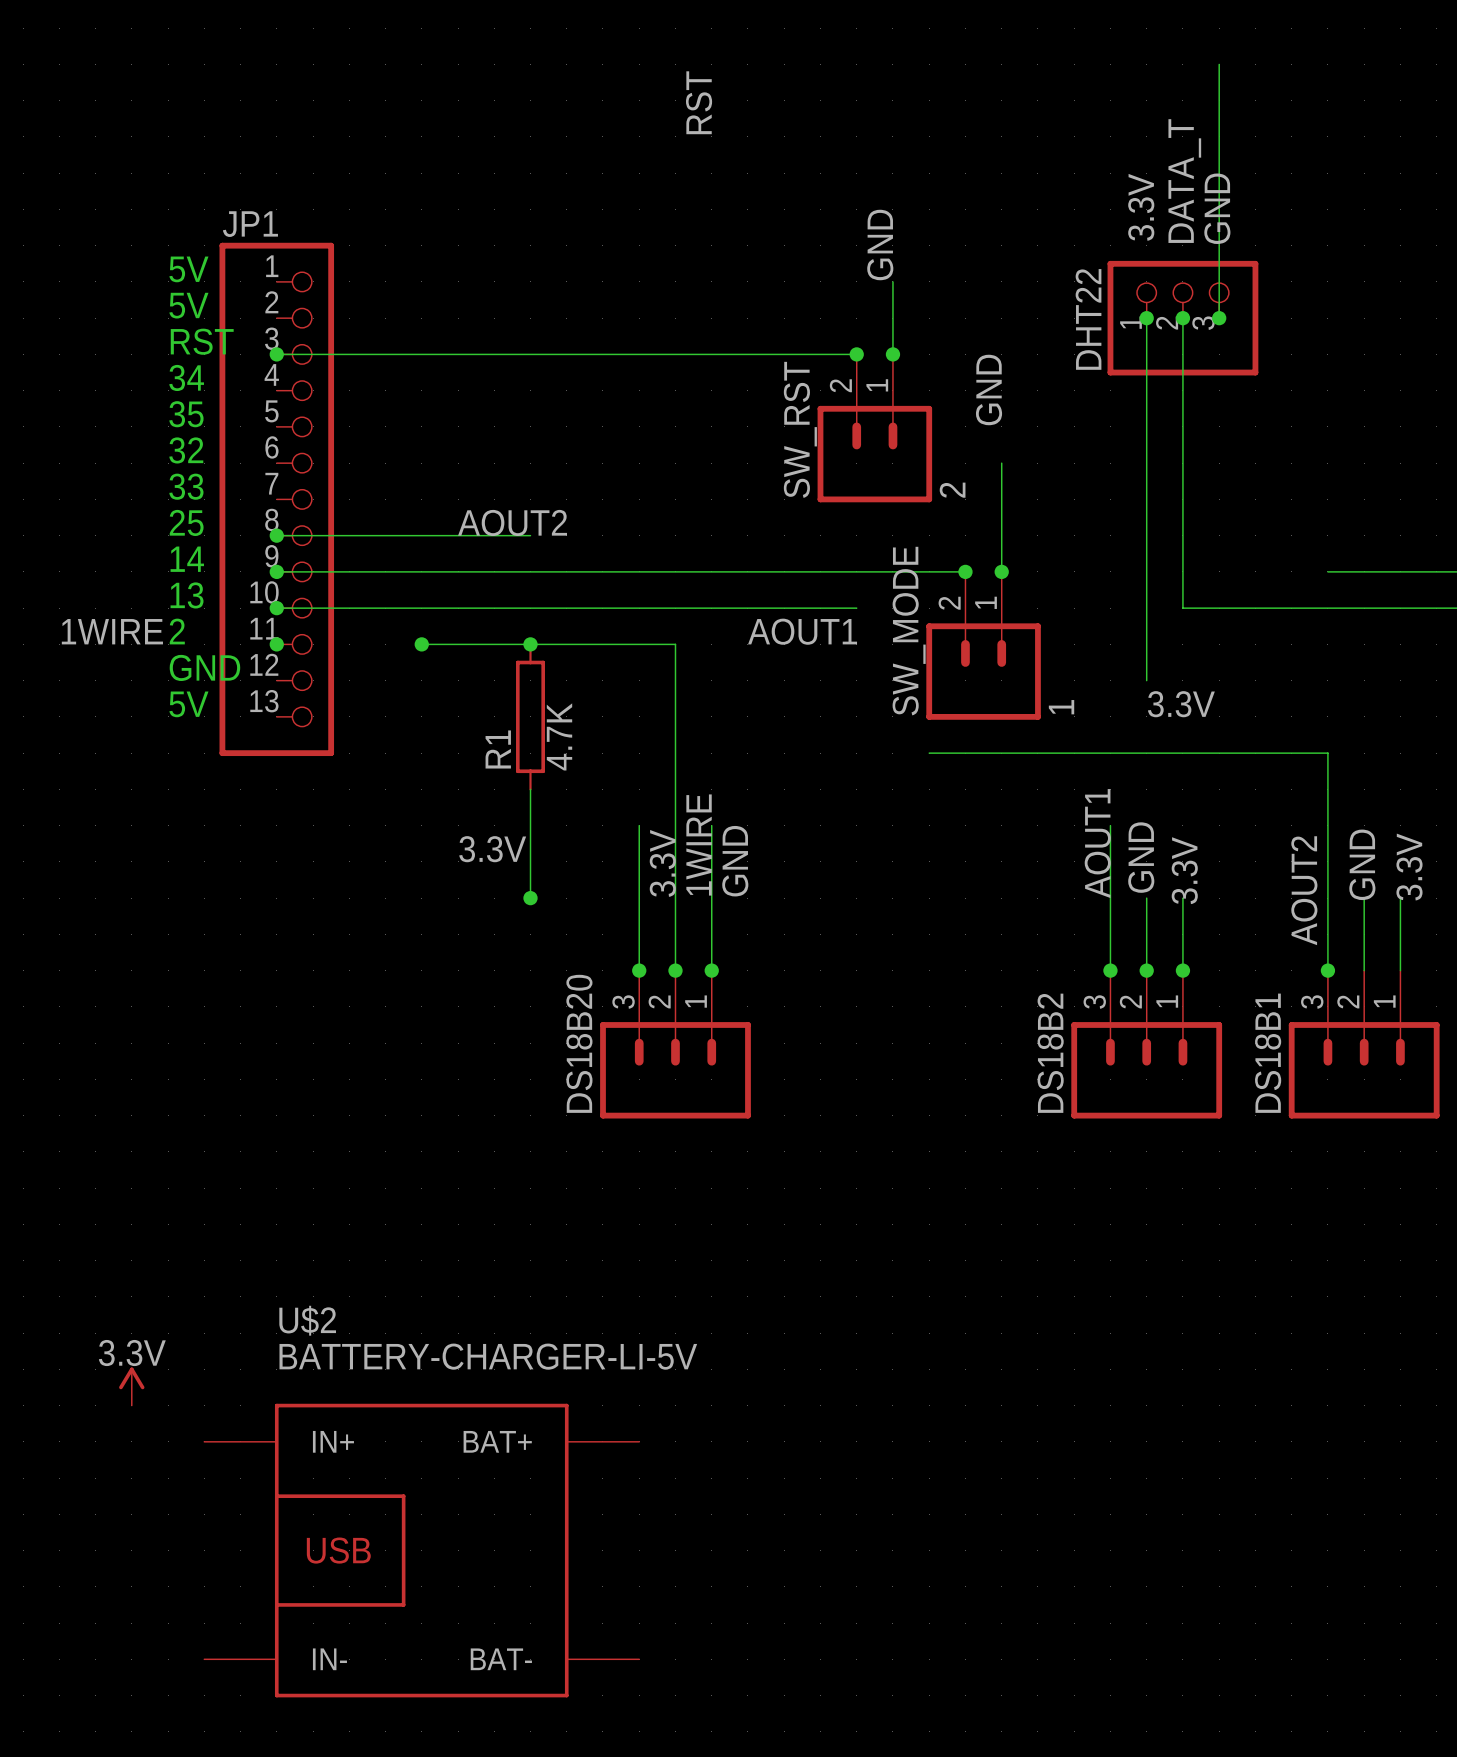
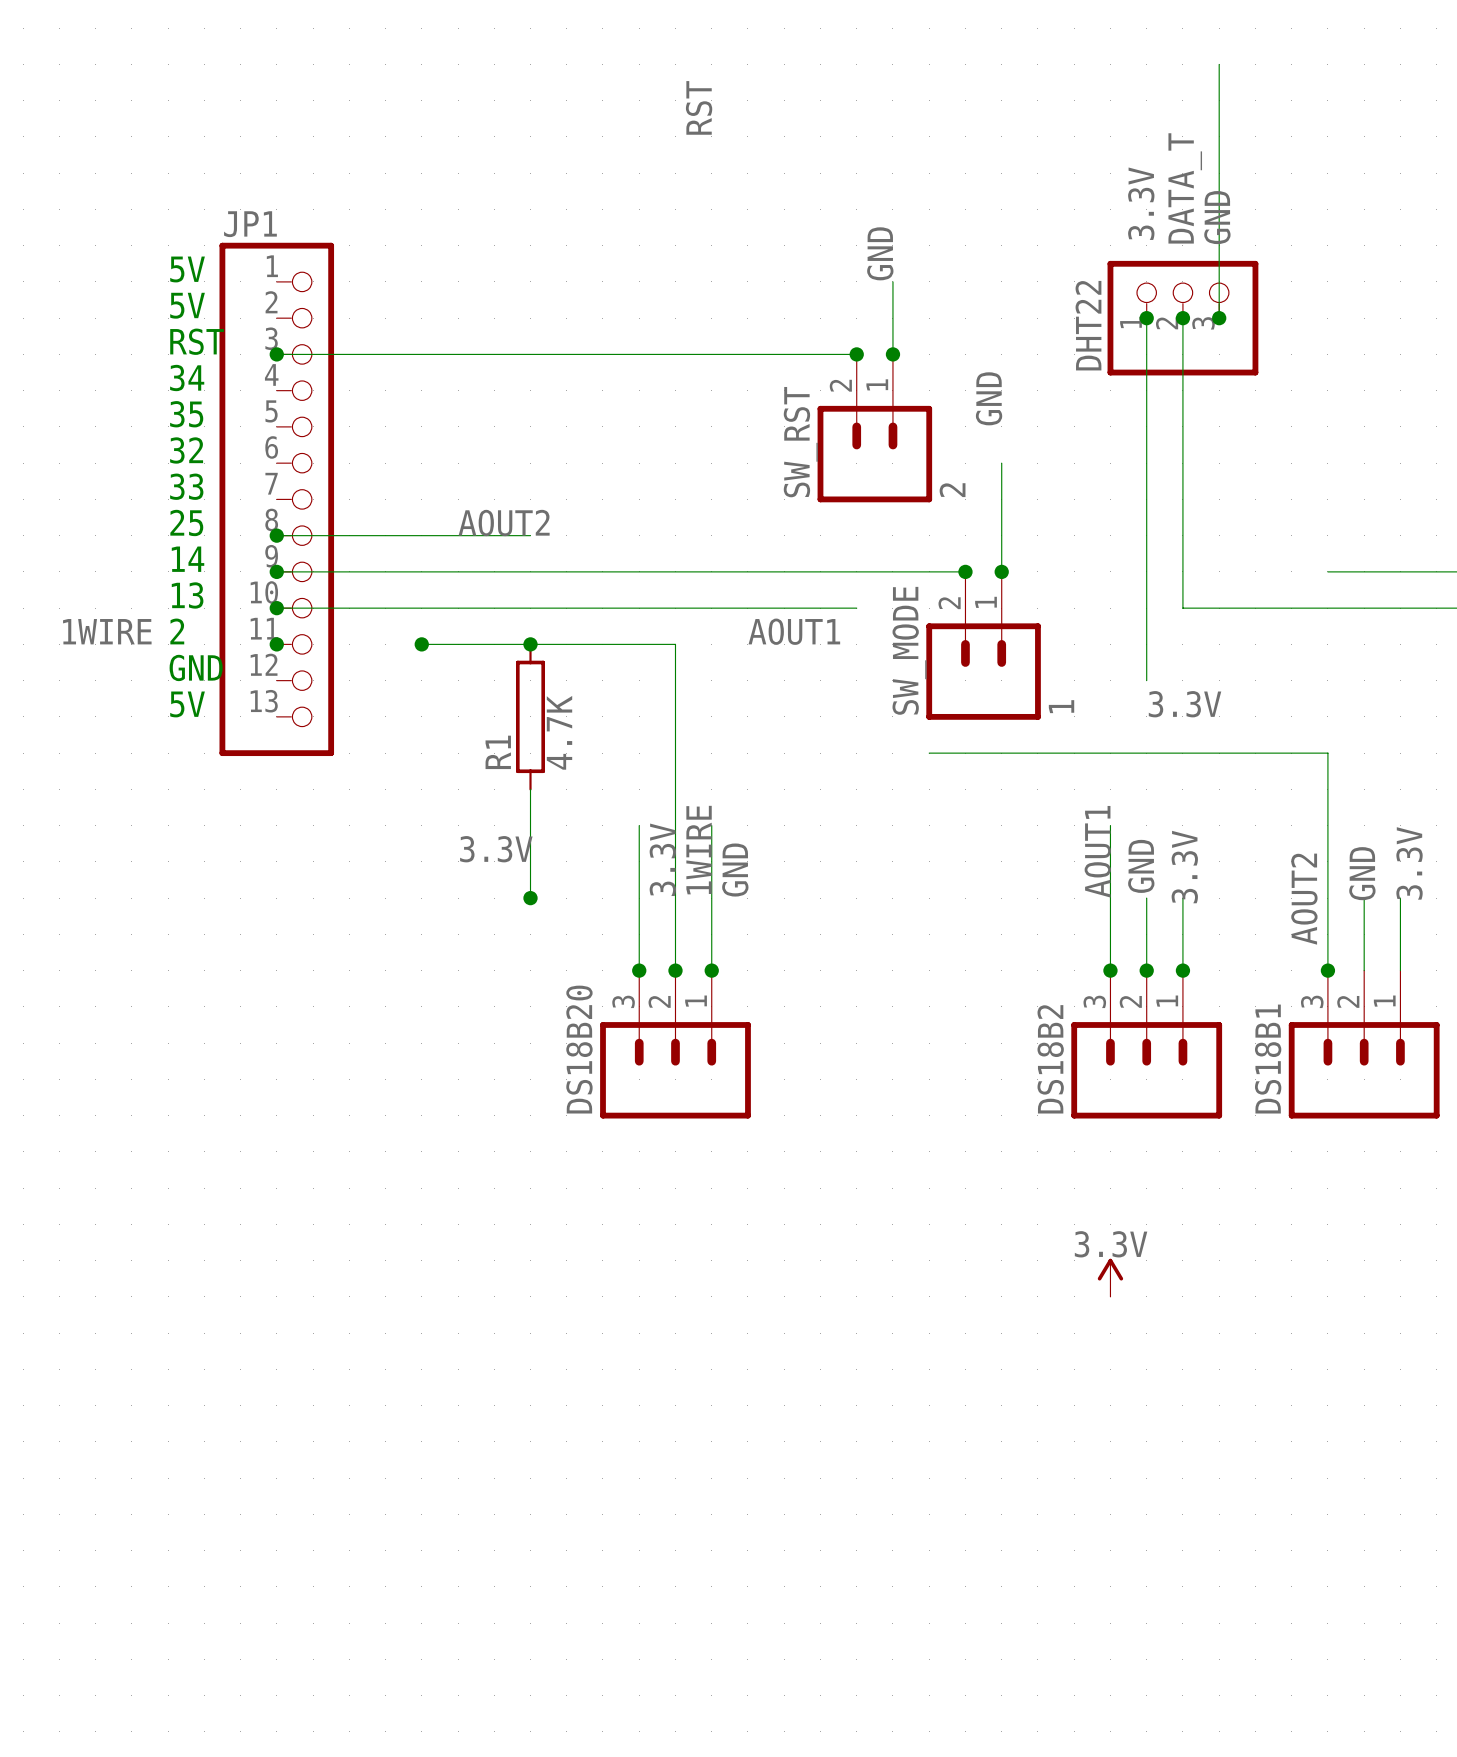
power symbol: none -> 3.3V (1110, 1277)
power symbol: 3.3V (131, 1386) -> none
U$2: BATTERY-CHARGER-LI-5V (421, 1550) -> none

